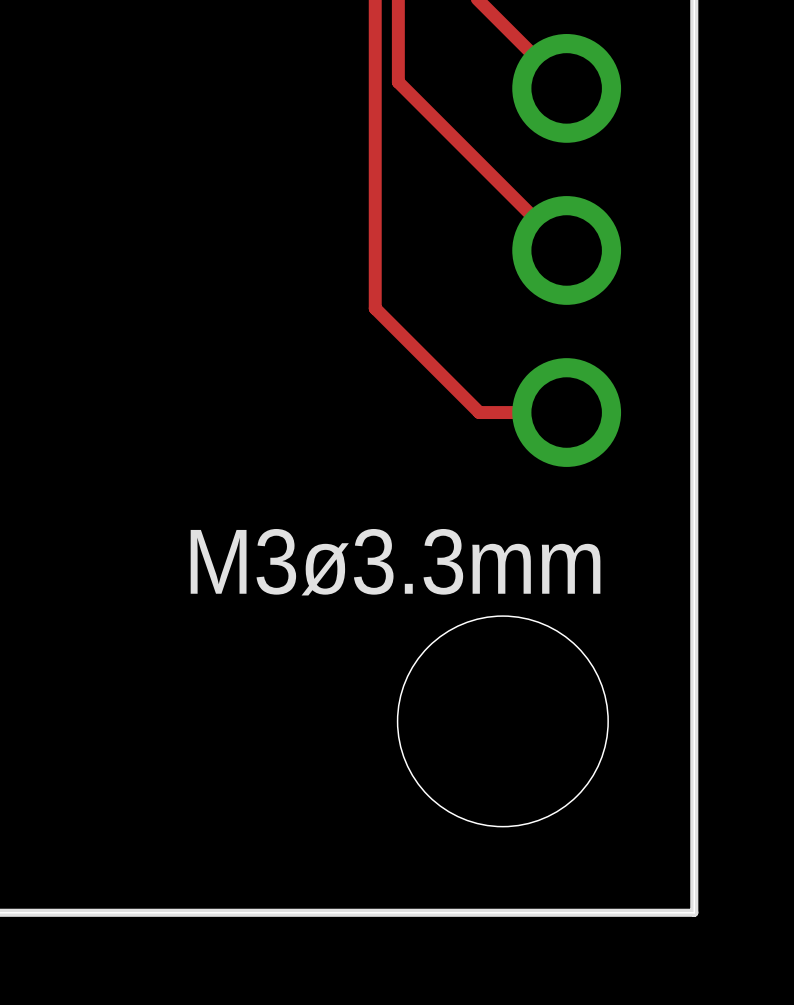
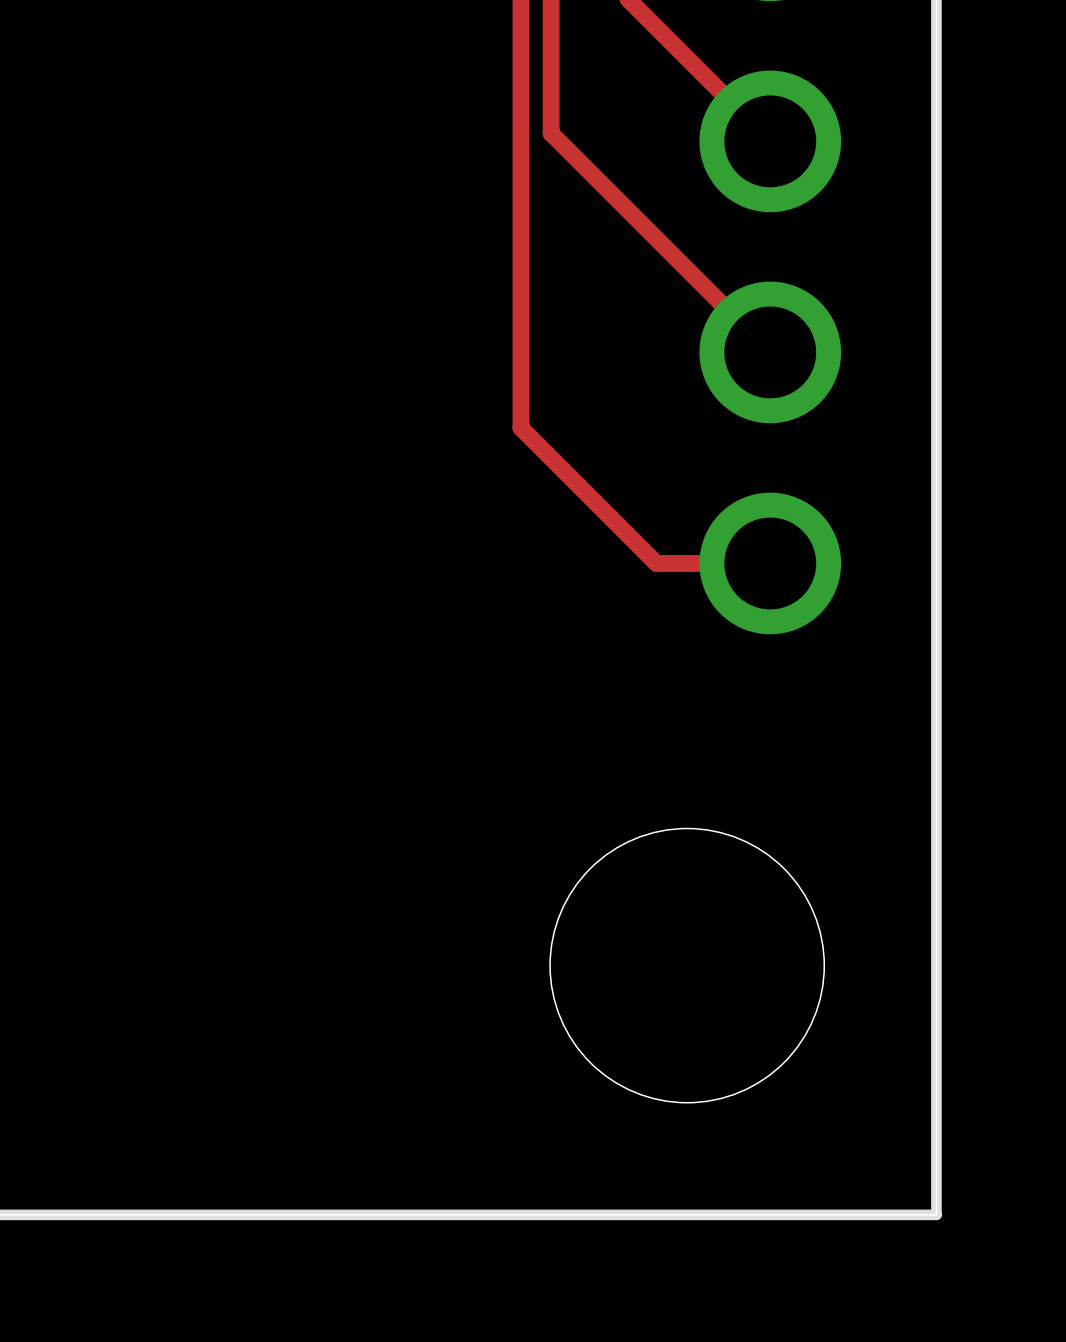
text: M3ø3.3mm (395, 562) -> none

